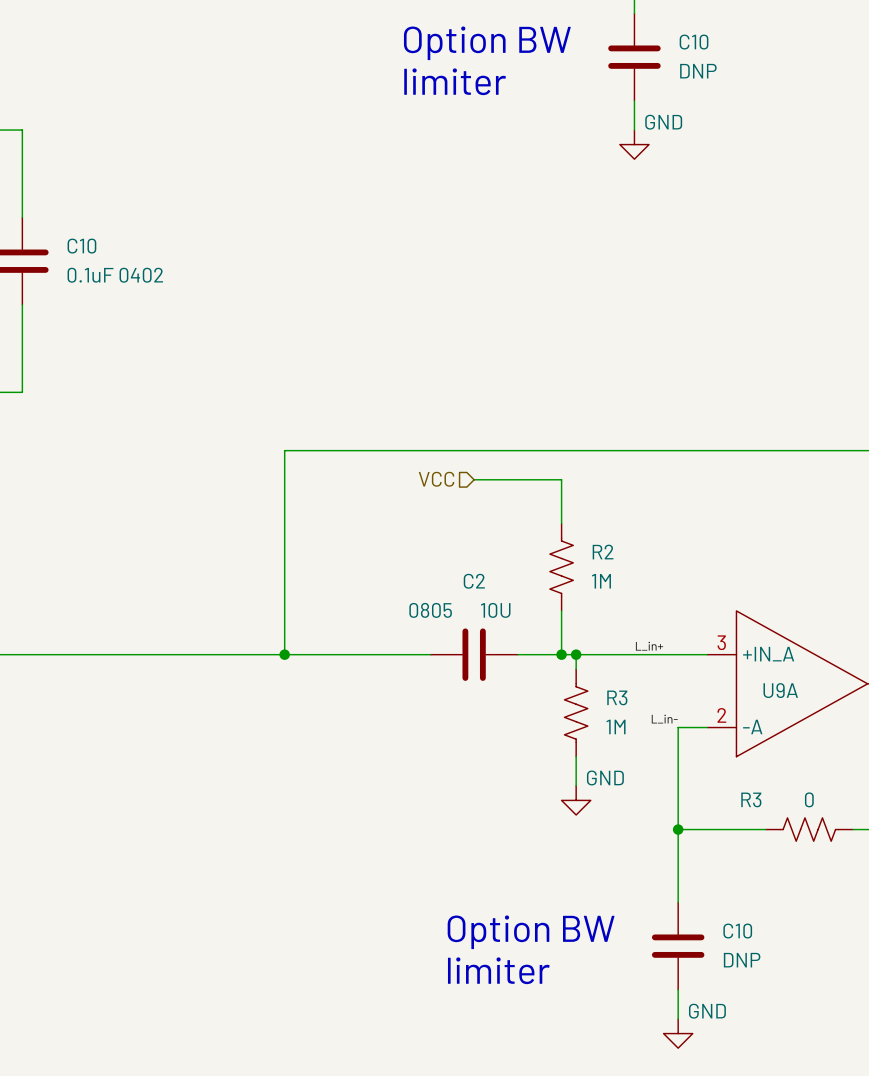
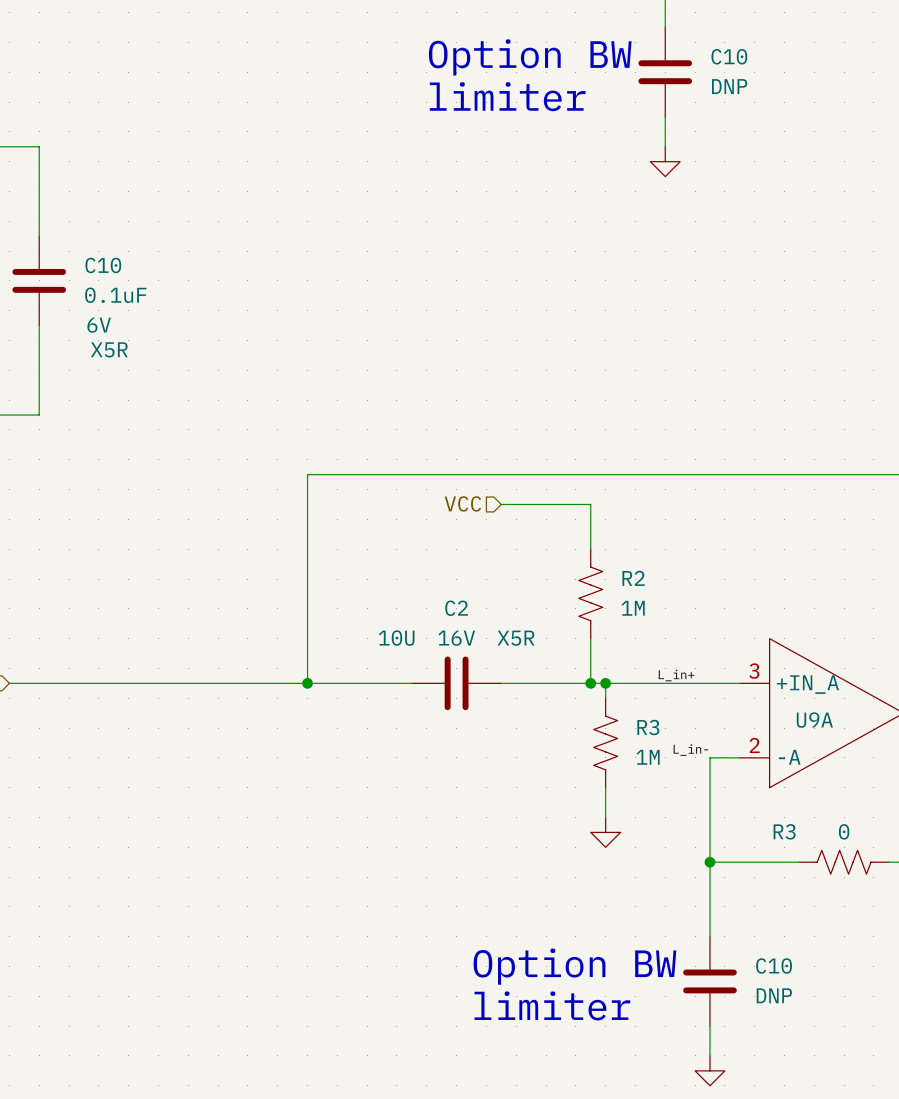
power symbol text: GND (663, 122) -> none
C10 value: 0.1uF 0402 (115, 275) -> 0.1uF (115, 295)
C10 text: none -> 6V (99, 325)
C10 text: none -> X5R (109, 349)
C2 text: 0805 (430, 610) -> none
C2 text: none -> 16V (456, 638)
C2 text: none -> X5R (515, 638)
C2 value position: 10U (495, 610) -> 10U (396, 638)
C2 position: (474, 654) -> (456, 683)
power symbol text: GND (605, 778) -> none
power symbol text: GND (707, 1011) -> none

